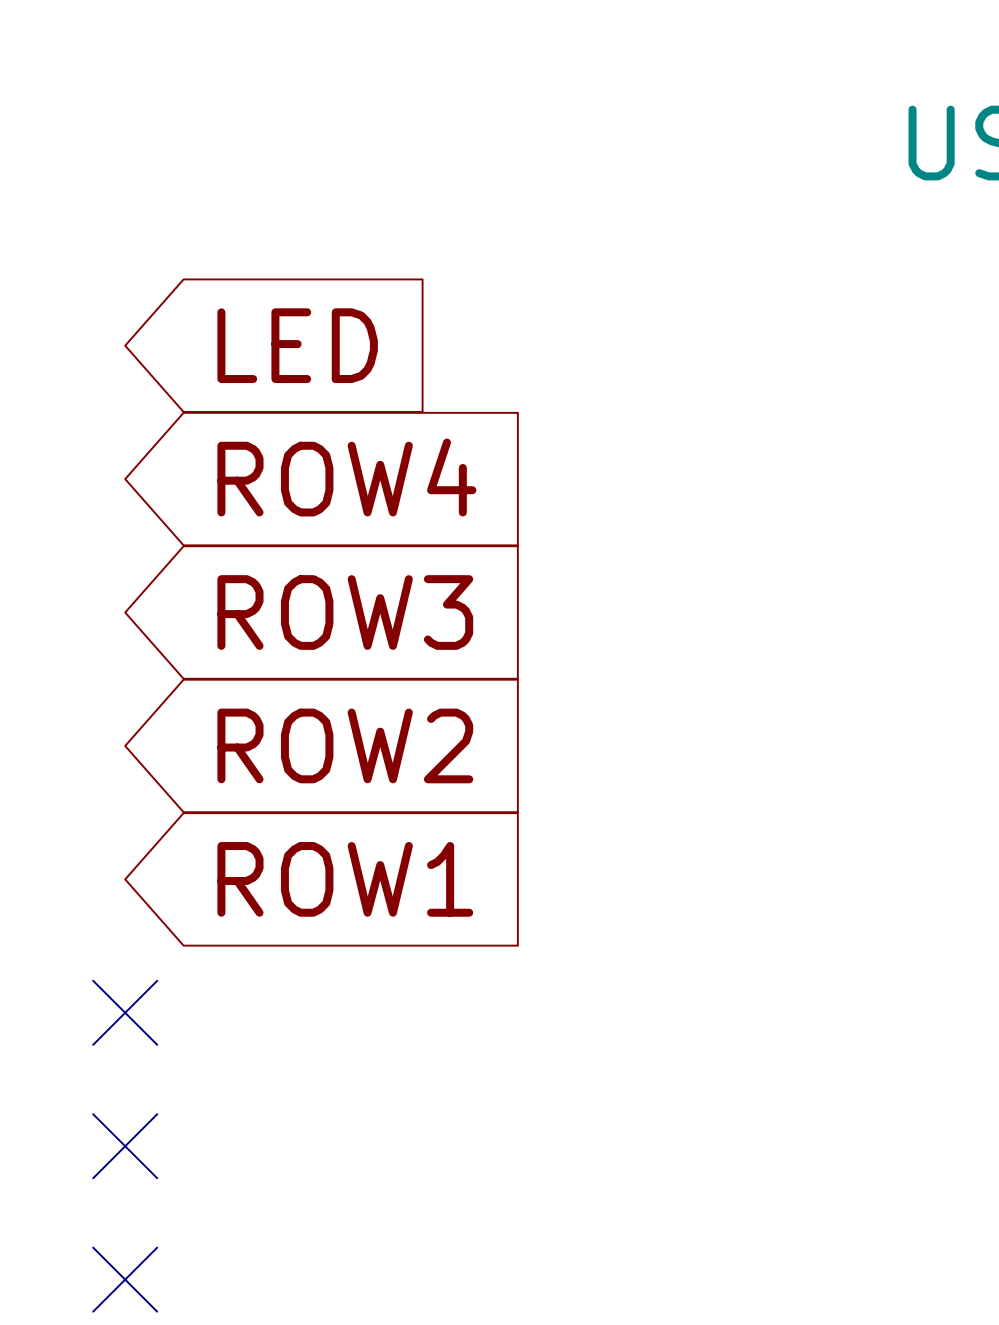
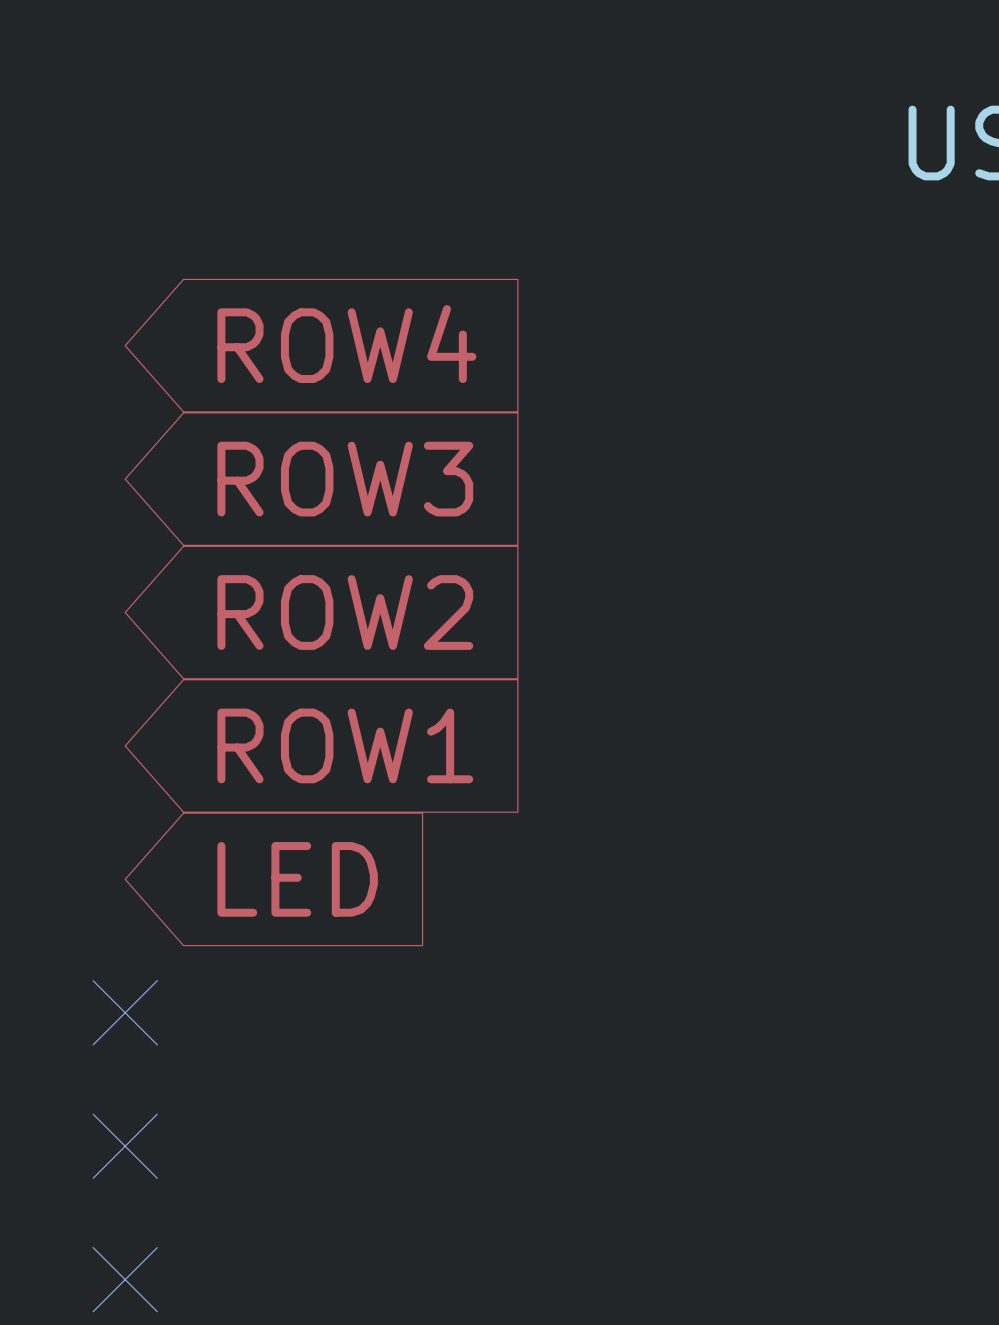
global label: LED (297, 345) -> ROW4 (346, 344)
global label: ROW4 (346, 477) -> ROW3 (345, 479)
global label: ROW3 (345, 612) -> ROW2 (345, 612)
global label: ROW2 (345, 745) -> ROW1 (345, 745)
global label: ROW1 (345, 879) -> LED (297, 879)

